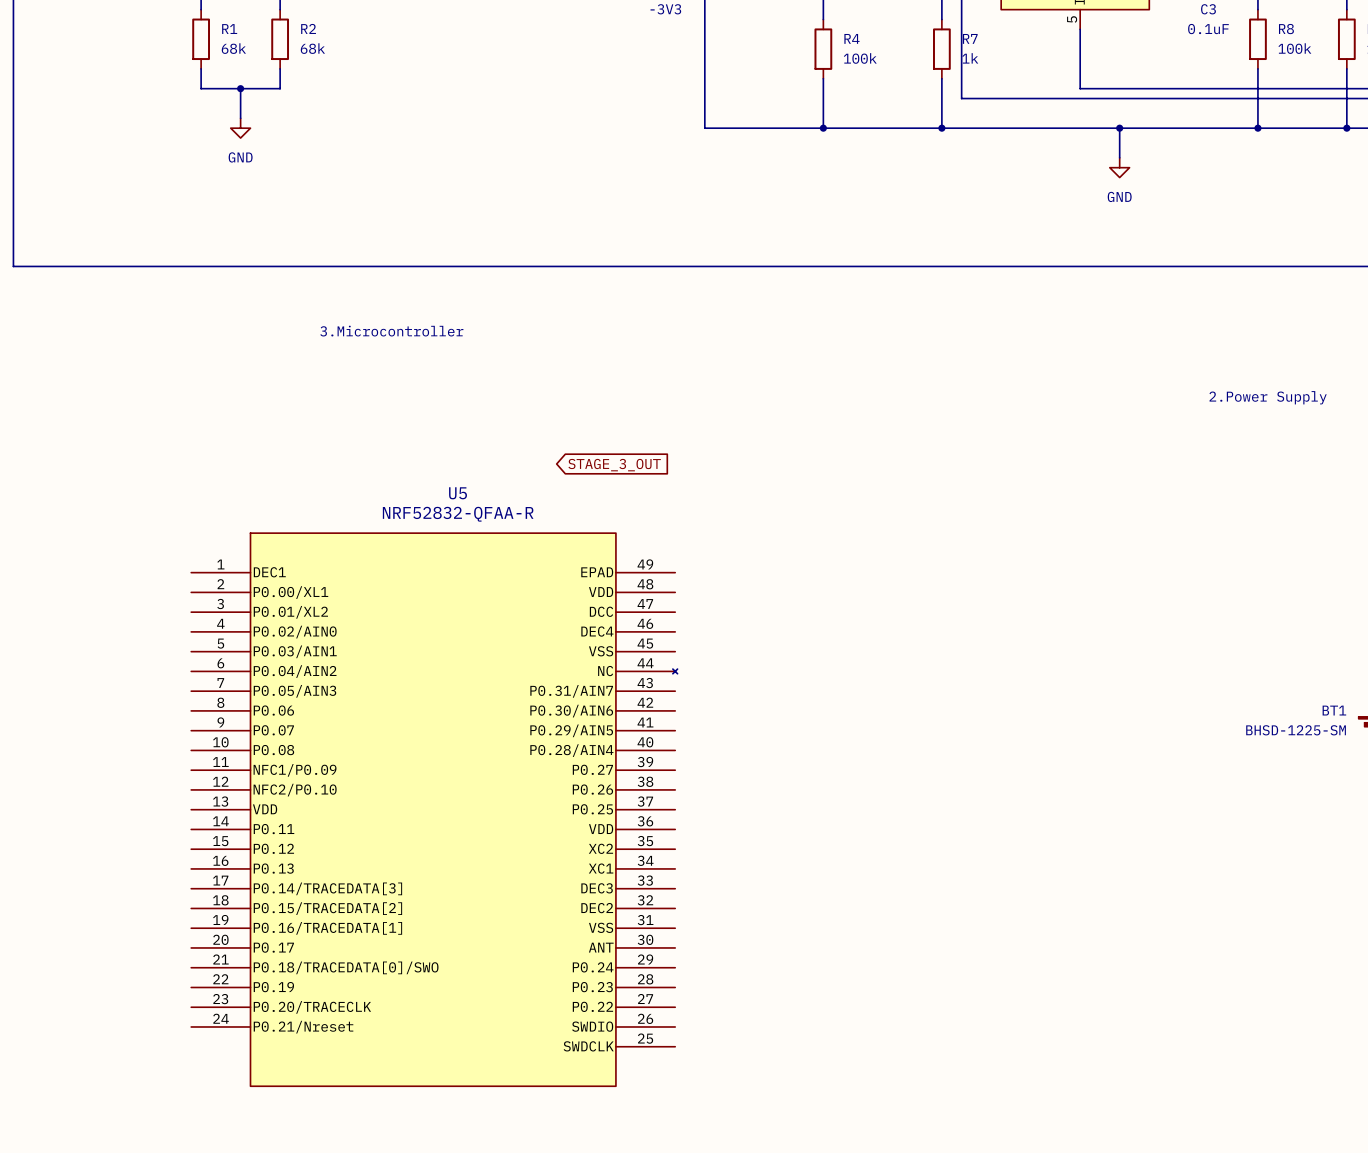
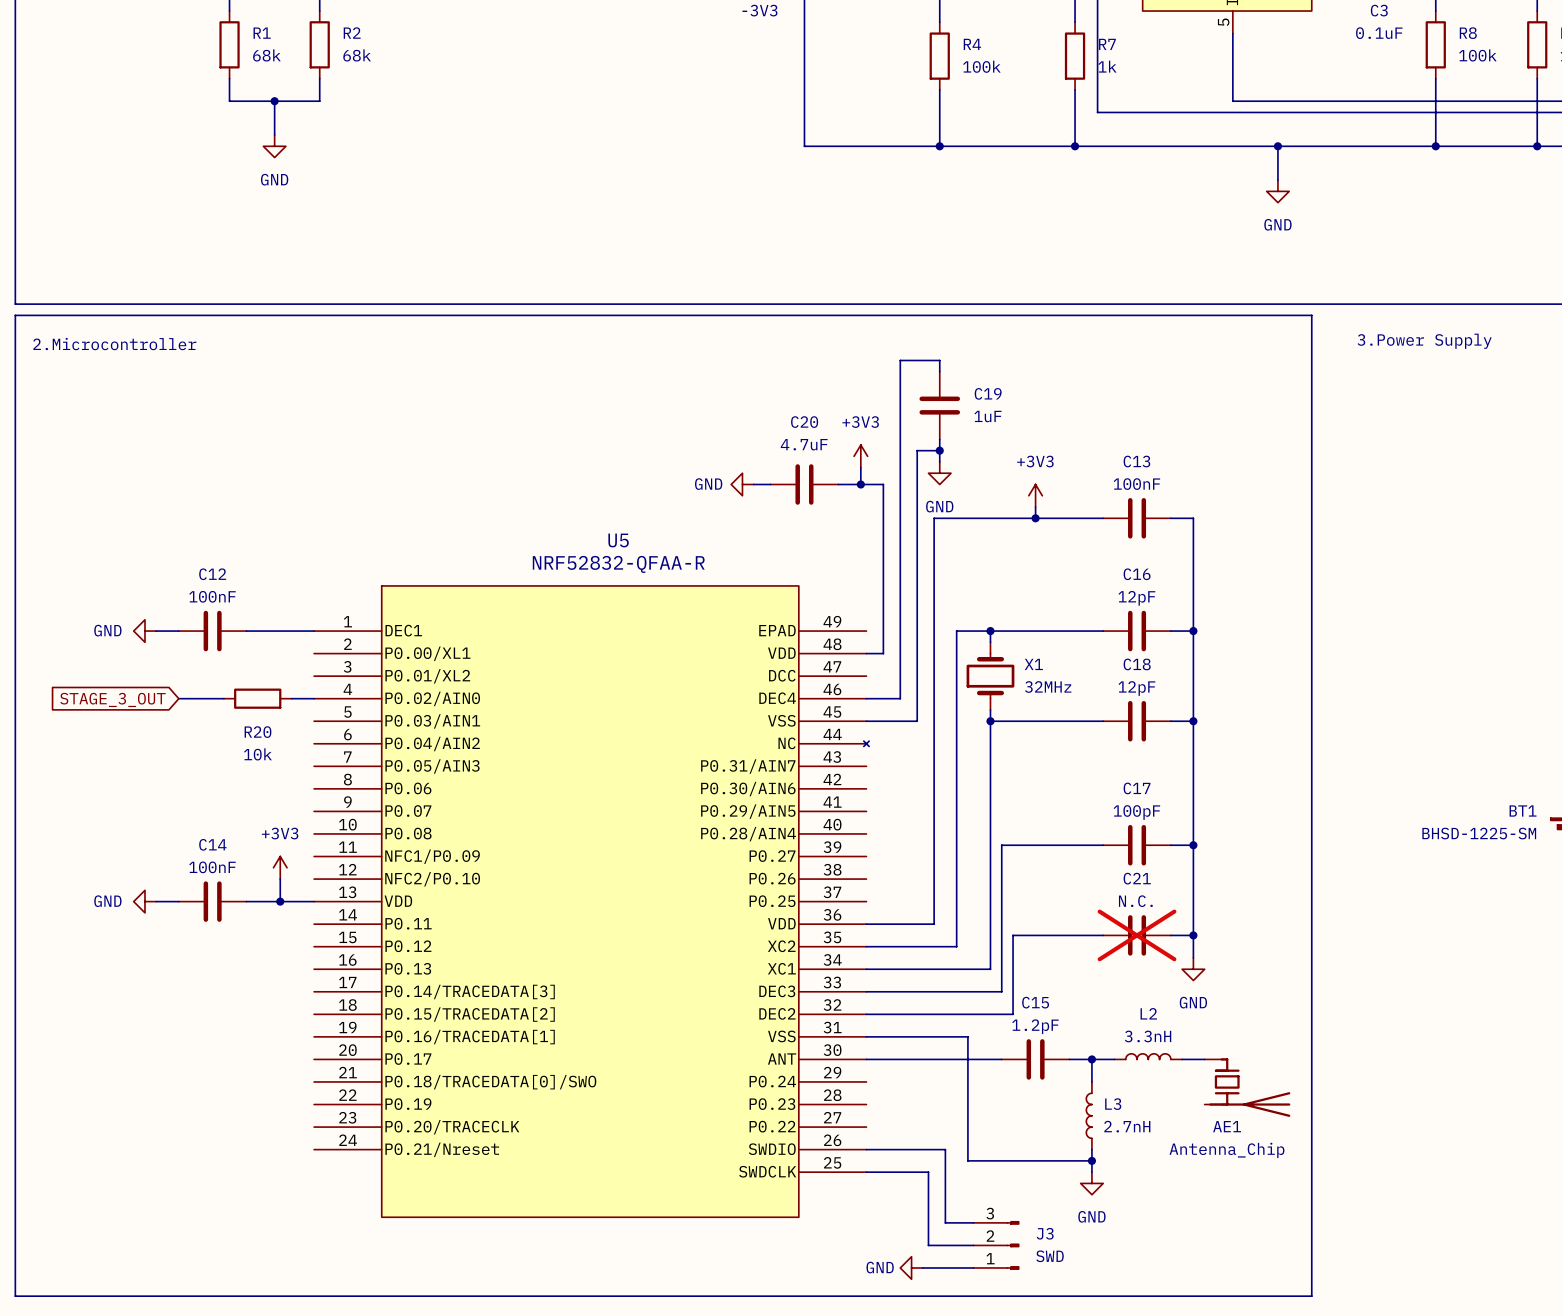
line: none -> (15, 315) (15, 1296) (1311, 1296) (1311, 315) (15, 315)
text: none -> 3.Power Supply (1424, 341)
text: none -> 2.Microcontroller (114, 344)
wire: none -> (939, 371) (939, 360) (900, 360) (900, 698) (866, 698)
text: 3.Microcontroller (391, 331) -> none
C19: none -> 1uF (939, 405)
wire: none -> (939, 439) (939, 461)
wire: none -> (939, 450) (917, 450) (917, 721) (866, 721)
junction: none -> (939, 450)
text: 2.Power Supply (1268, 397) -> none
power symbol: none -> +3V3 (860, 456)
wire: none -> (860, 467) (860, 484)
power symbol: none -> GND (939, 473)
power symbol: none -> GND (742, 484)
wire: none -> (753, 484) (770, 484)
C20: none -> 4.7uF (804, 484)
wire: none -> (838, 484) (883, 484) (883, 653) (866, 653)
junction: none -> (860, 484)
power symbol: none -> +3V3 (1035, 495)
wire: none -> (1035, 507) (1035, 518)
junction: none -> (1035, 518)
wire: none -> (1103, 518) (934, 518) (934, 924) (866, 924)
C13: none -> 100nF (1137, 518)
wire: none -> (1170, 518) (1193, 518) (1193, 957)
global label: STAGE_3_OUT (614, 465) -> none
power symbol: none -> GND (144, 631)
wire: none -> (156, 631) (178, 631)
C12: none -> 100nF (212, 631)
wire: none -> (246, 631) (314, 631)
wire: none -> (990, 631) (990, 642)
junction: none -> (990, 631)
wire: none -> (1103, 631) (956, 631) (956, 946) (866, 946)
C16: none -> 12pF (1137, 631)
wire: none -> (1170, 631) (1193, 631)
junction: none -> (1193, 631)
X1: none -> 32MHz (990, 676)
wire: none -> (178, 698) (223, 698)
R20: none -> 10k (257, 698)
global label: none -> STAGE_3_OUT (112, 699)
wire: none -> (990, 709) (990, 969) (866, 969)
wire: none -> (990, 721) (1103, 721)
junction: none -> (990, 721)
C18: none -> 12pF (1137, 721)
wire: none -> (1170, 721) (1193, 721)
junction: none -> (1193, 721)
wire: none -> (1103, 845) (1001, 845) (1001, 991) (866, 991)
C17: none -> 100pF (1137, 845)
wire: none -> (1170, 845) (1193, 845)
junction: none -> (1193, 845)
power symbol: none -> +3V3 (280, 867)
wire: none -> (280, 879) (280, 901)
power symbol: none -> GND (144, 901)
wire: none -> (156, 901) (178, 901)
C14: none -> 100nF (212, 901)
junction: none -> (280, 901)
U5 position: (434, 809) -> (591, 901)
wire: none -> (1103, 935) (1013, 935) (1013, 1014) (866, 1014)
C21: none -> N.C. (1137, 935)
wire: none -> (1170, 935) (1193, 935)
junction: none -> (1193, 935)
power symbol: none -> GND (1193, 969)
wire: none -> (866, 1036) (967, 1036) (967, 1160) (1091, 1160)
L2: none -> 3.3nH (1148, 1056)
wire: none -> (866, 1059) (1001, 1059)
C15: none -> 1.2pF (1035, 1059)
wire: none -> (1069, 1059) (1114, 1059)
wire: none -> (1091, 1059) (1091, 1081)
junction: none -> (1091, 1059)
wire: none -> (1182, 1059) (1204, 1059)
AE1: none -> Antenna_Chip (1247, 1087)
L3: none -> 2.7nH (1089, 1115)
wire: none -> (866, 1149) (945, 1149) (945, 1222) (973, 1222)
wire: none -> (1091, 1149) (1091, 1172)
junction: none -> (1091, 1160)
wire: none -> (866, 1172) (928, 1172) (928, 1245) (973, 1245)
power symbol: none -> GND (1091, 1183)
J3: none -> SWD (996, 1245)
power symbol: none -> GND (911, 1267)
wire: none -> (922, 1267) (973, 1267)

